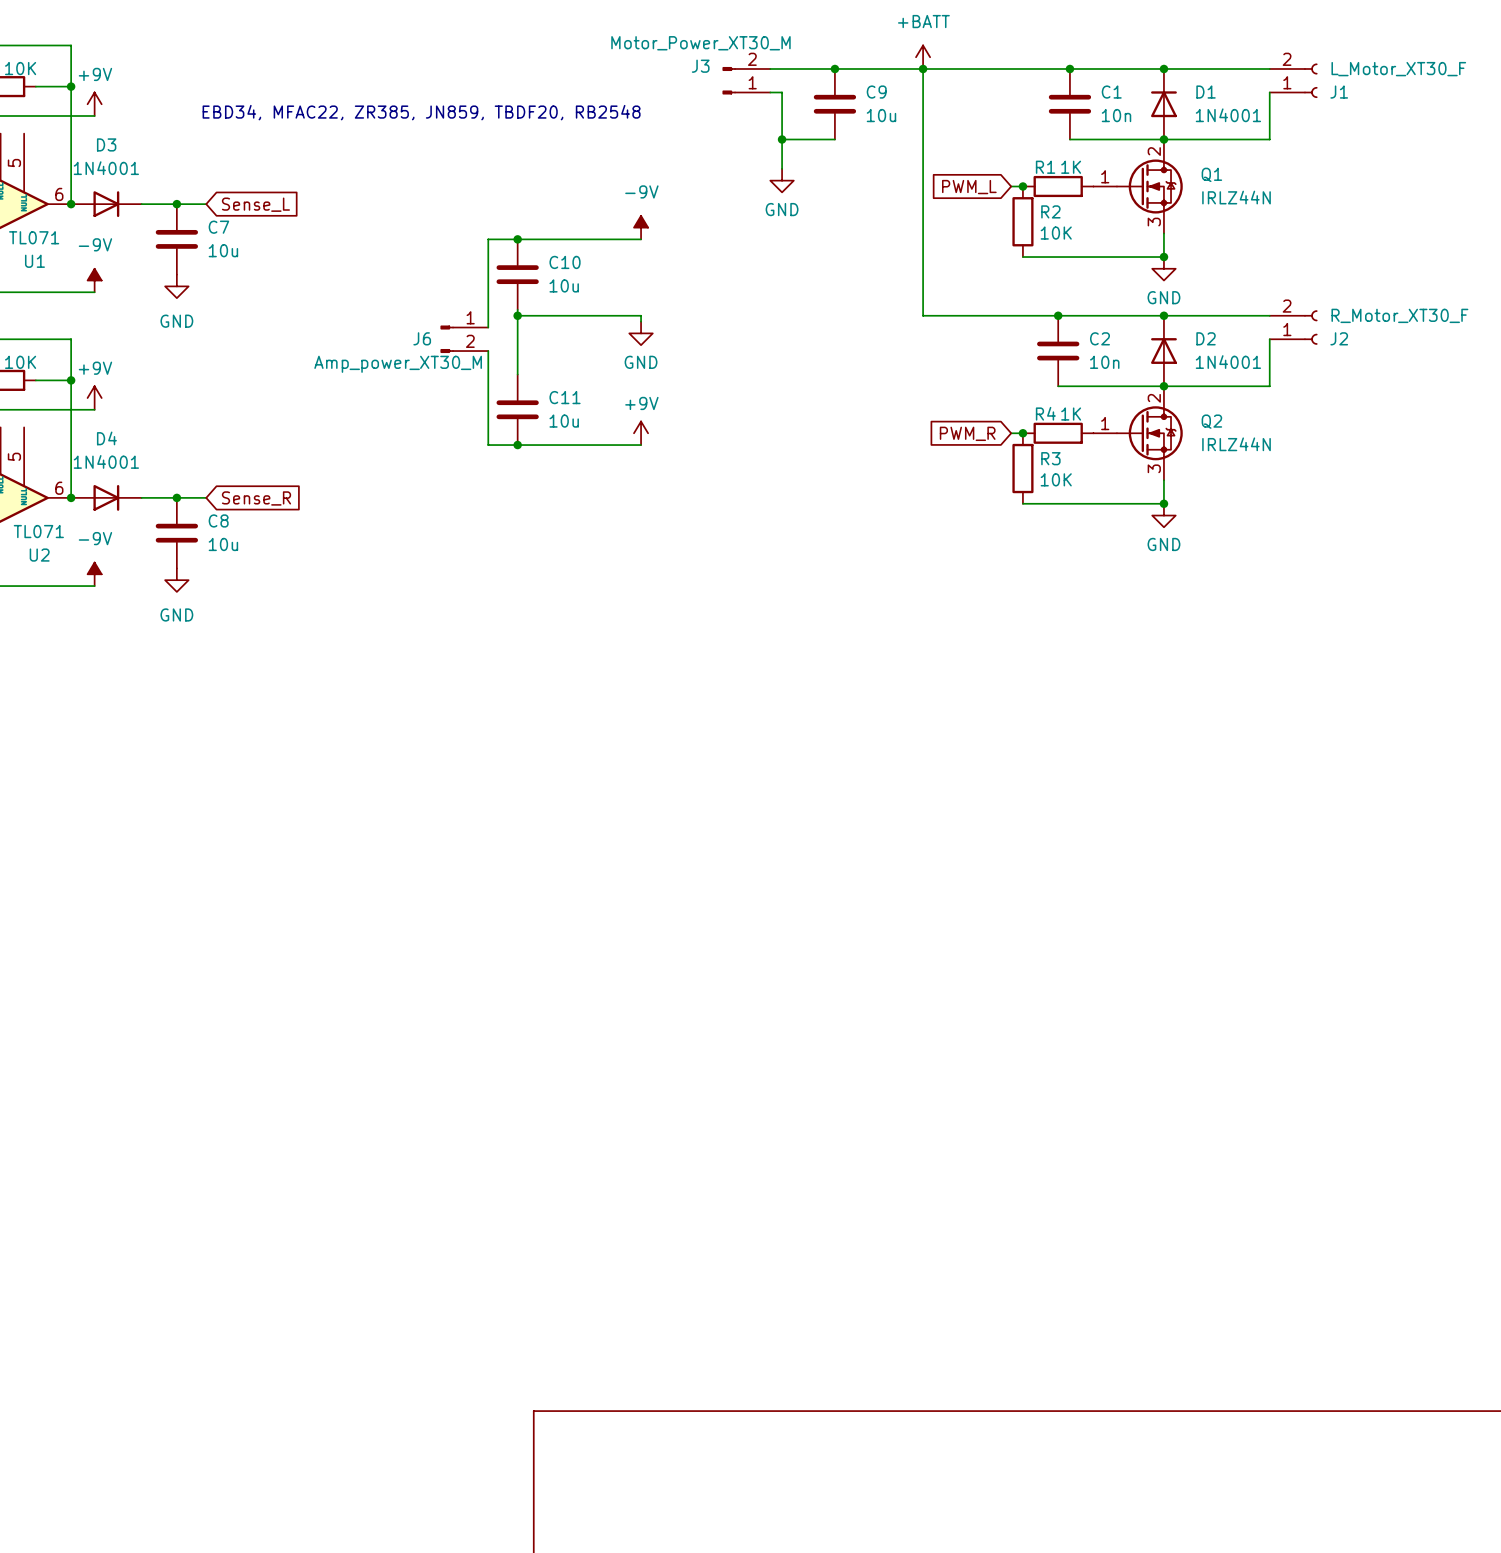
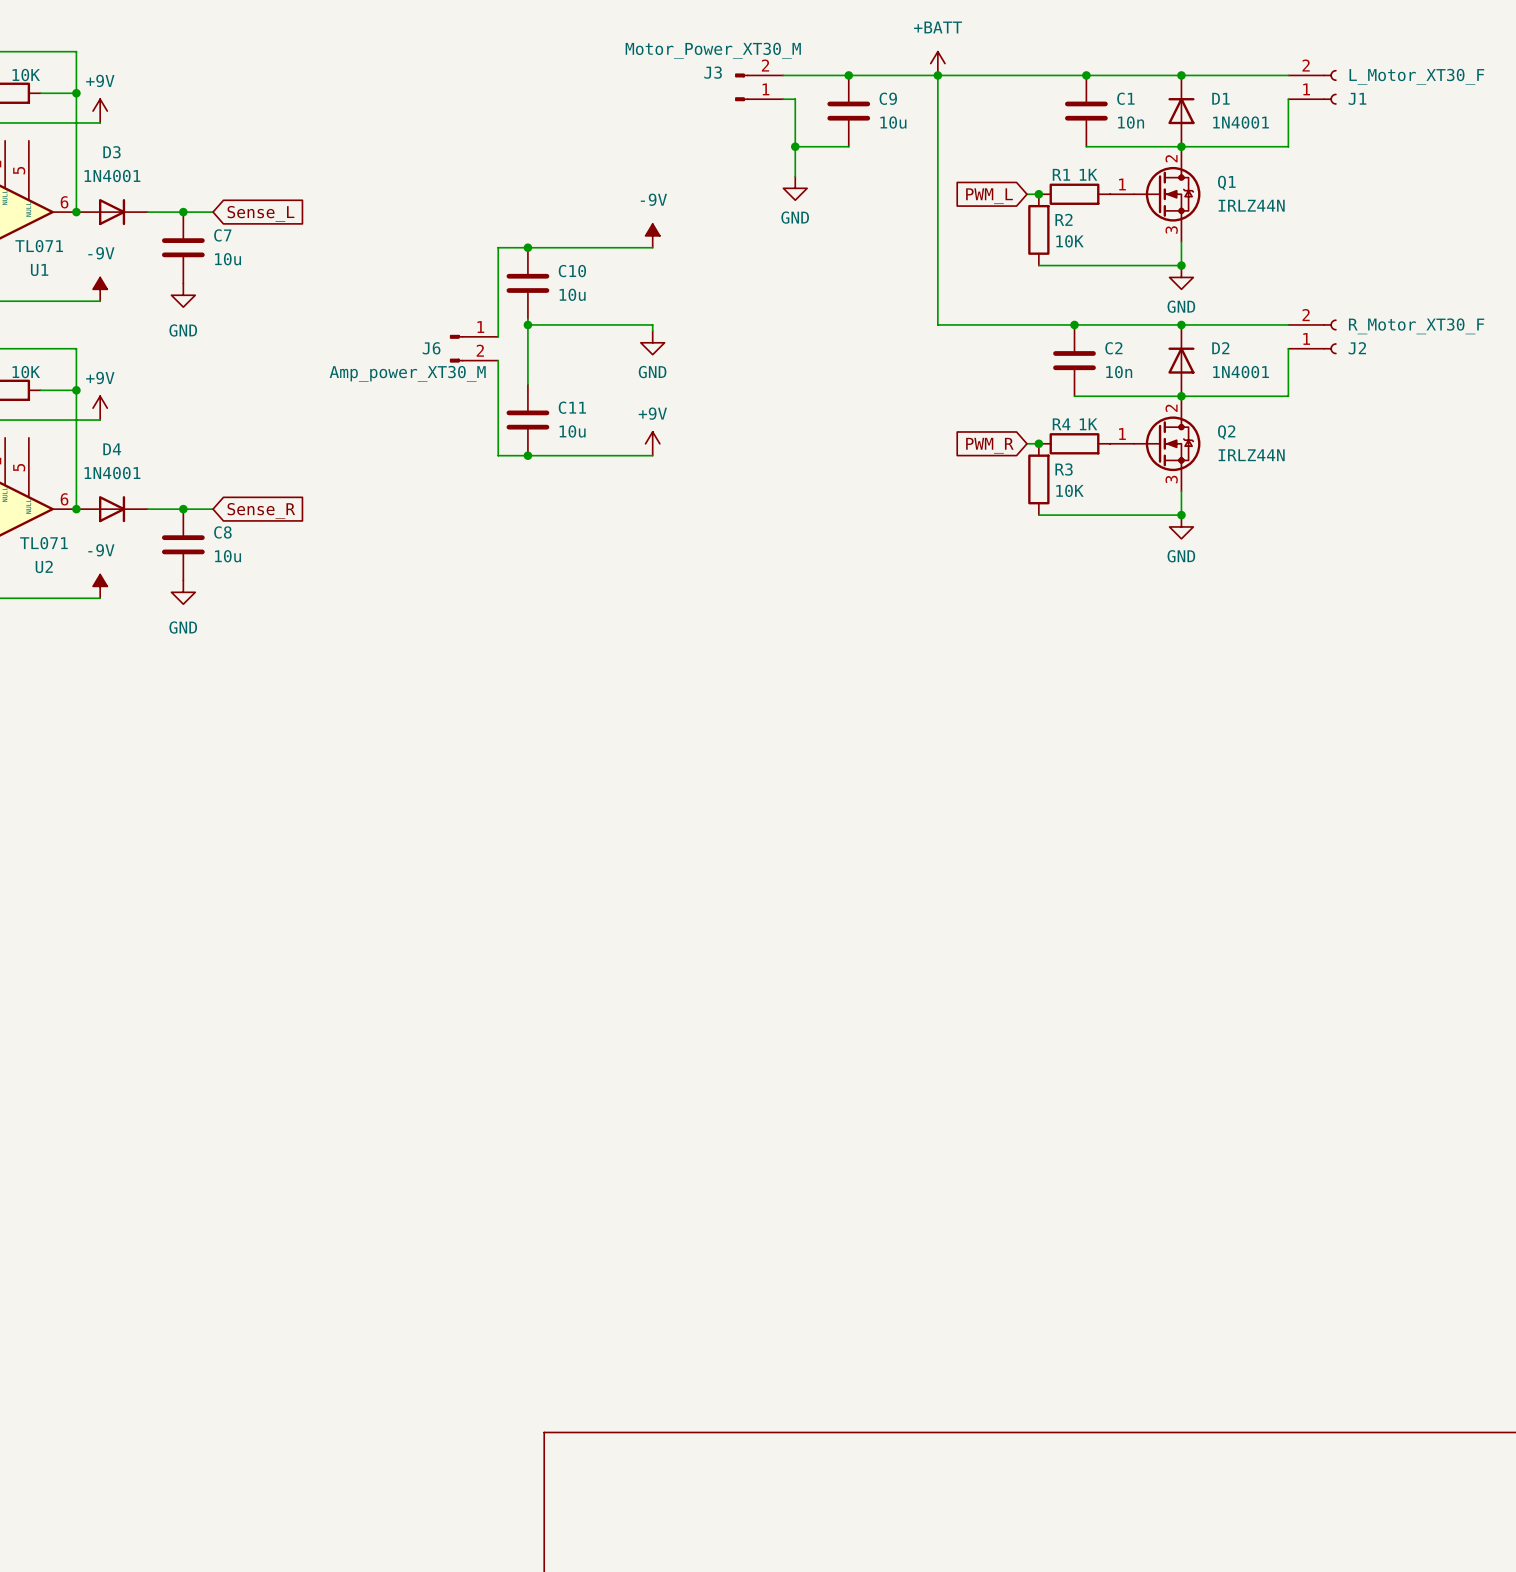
text: EBD34, MFAC22, ZR385, JN859, TBDF20, RB2548 (421, 112) -> none

